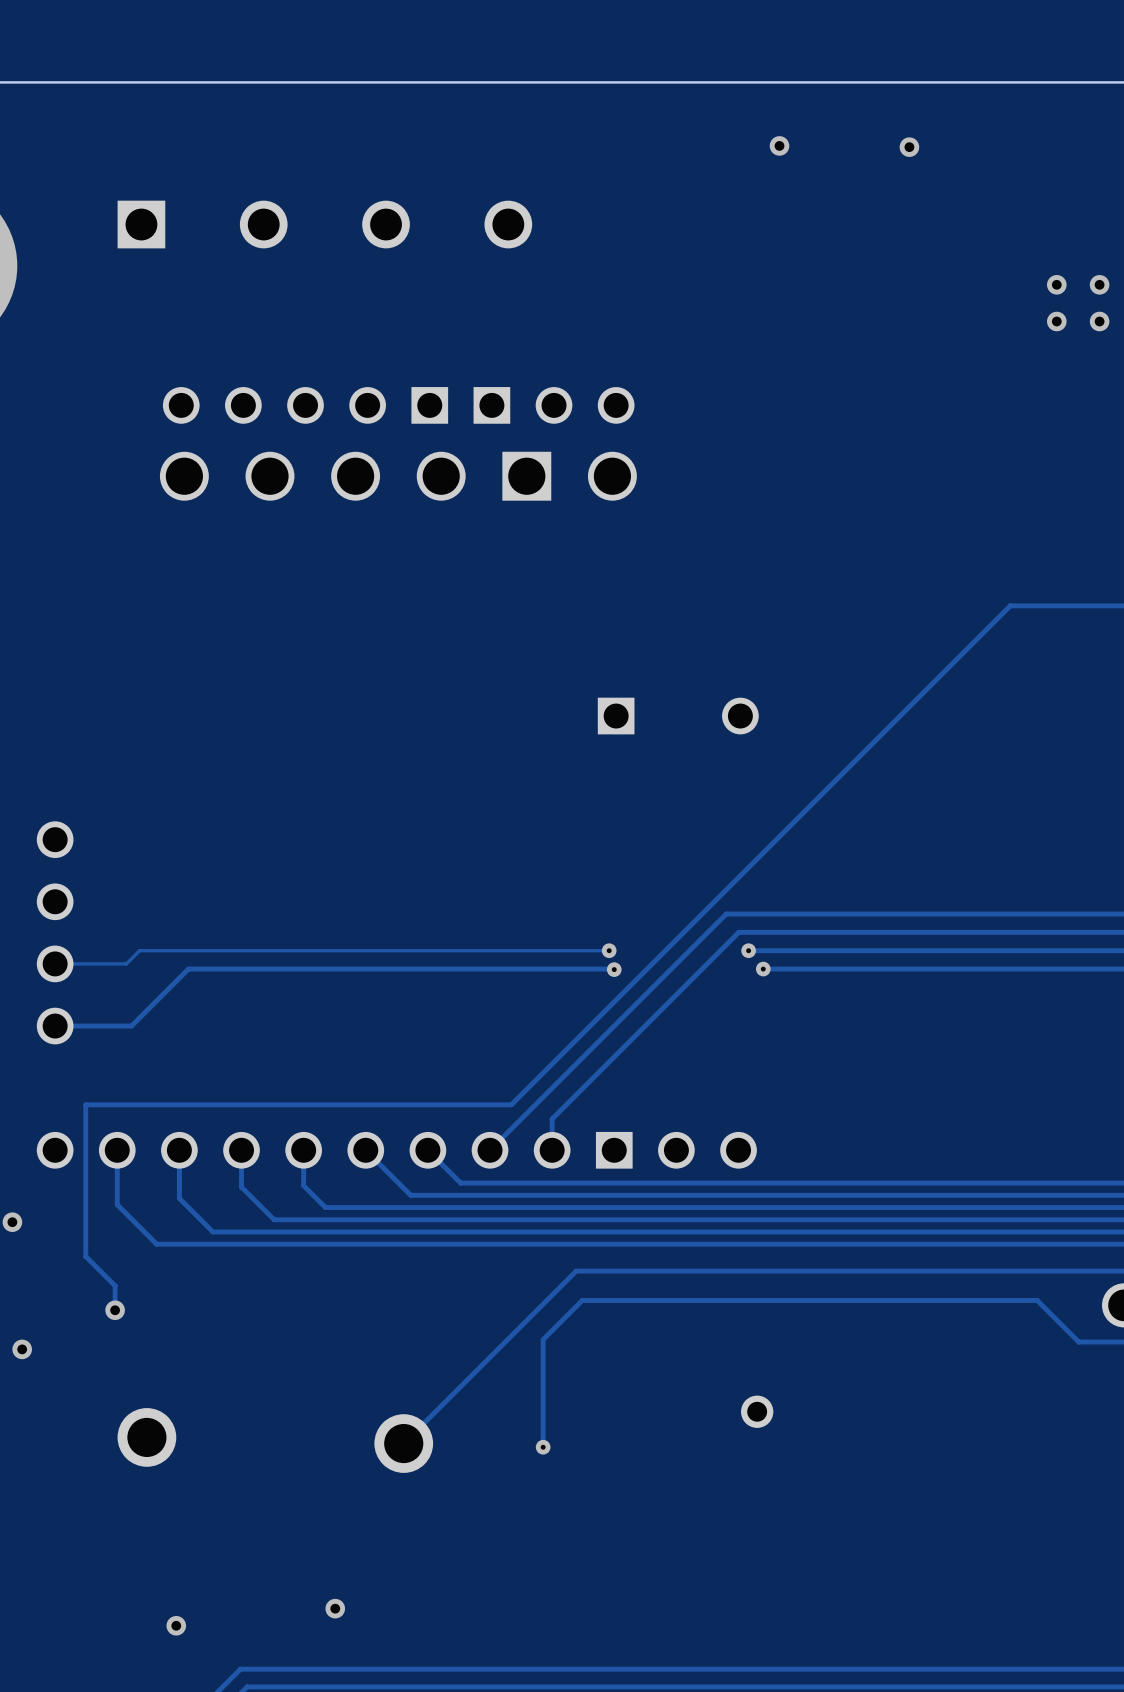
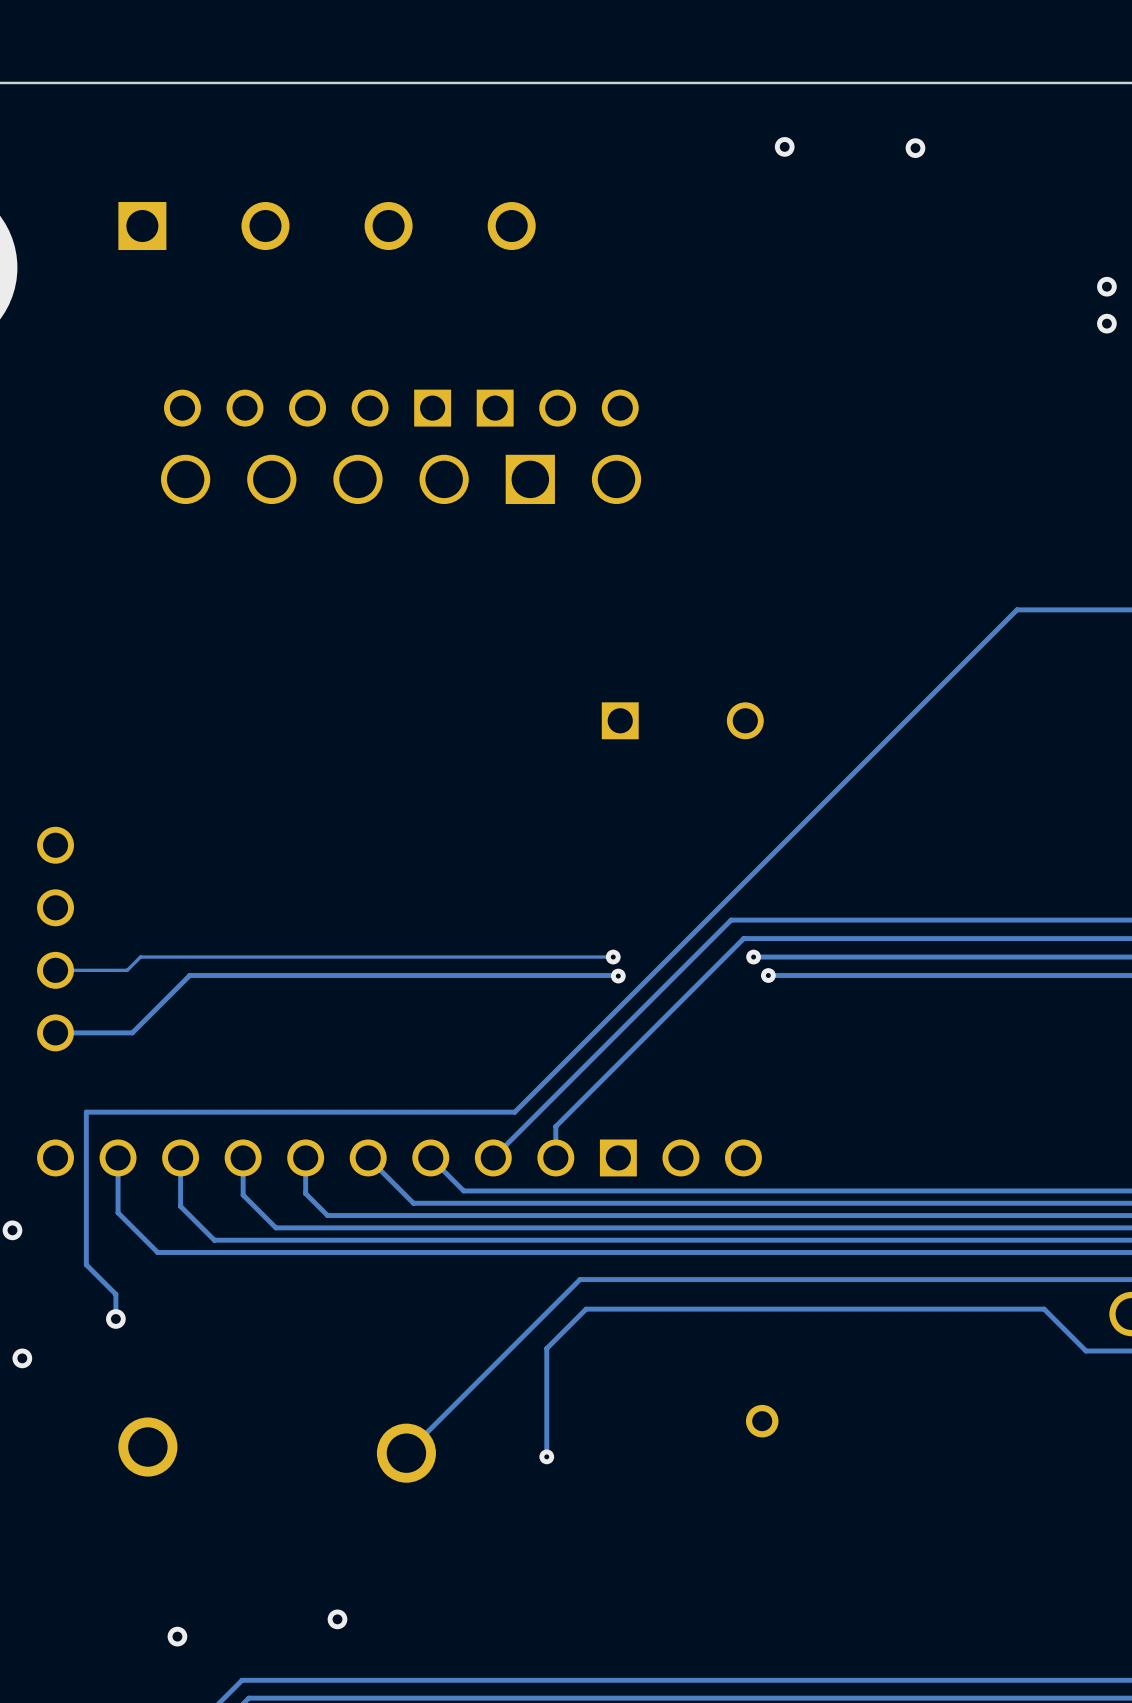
via: (1056, 284) -> none
via: (1056, 321) -> none

